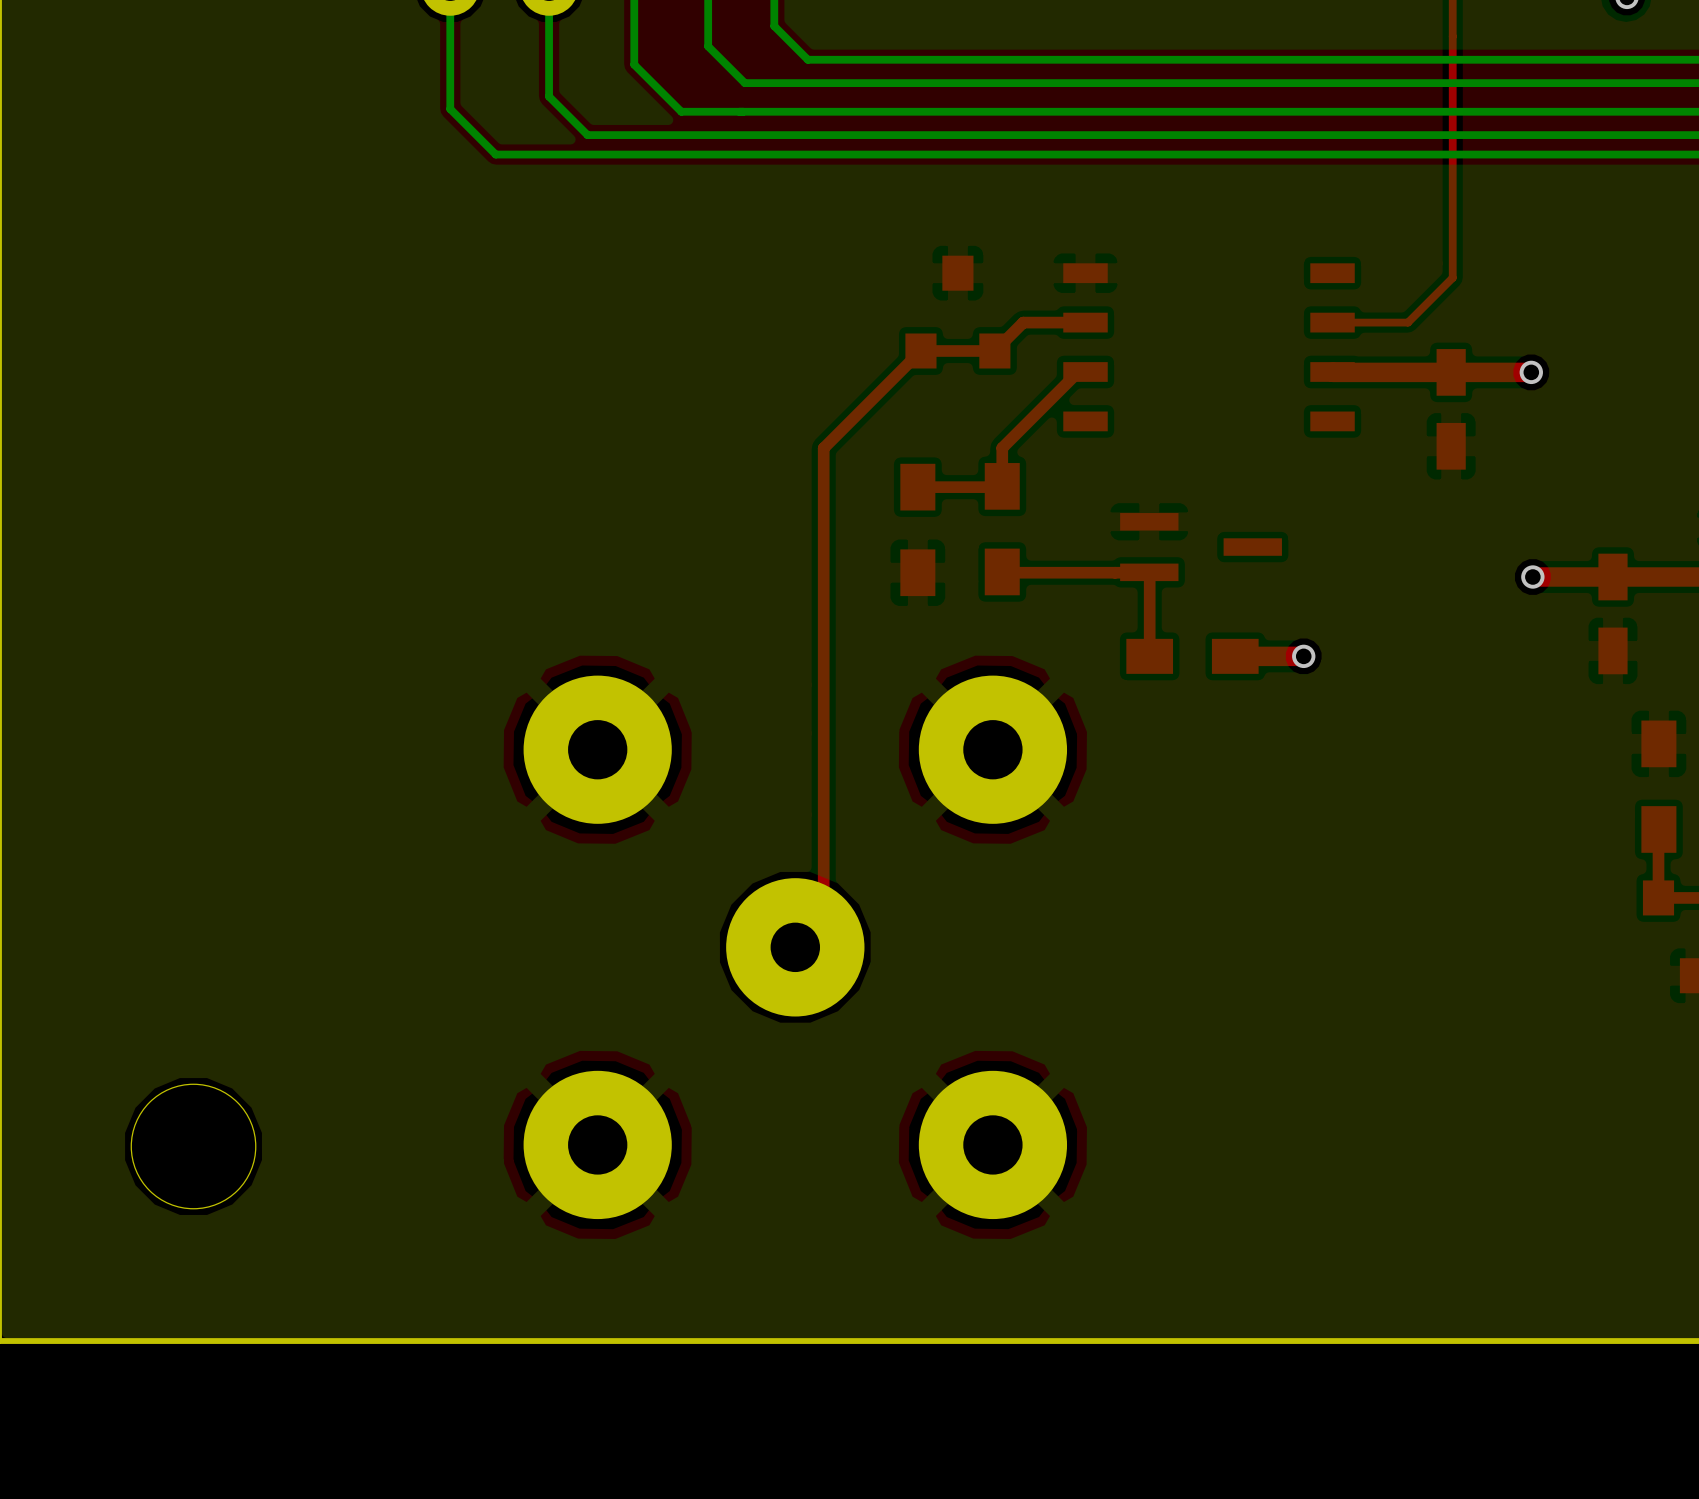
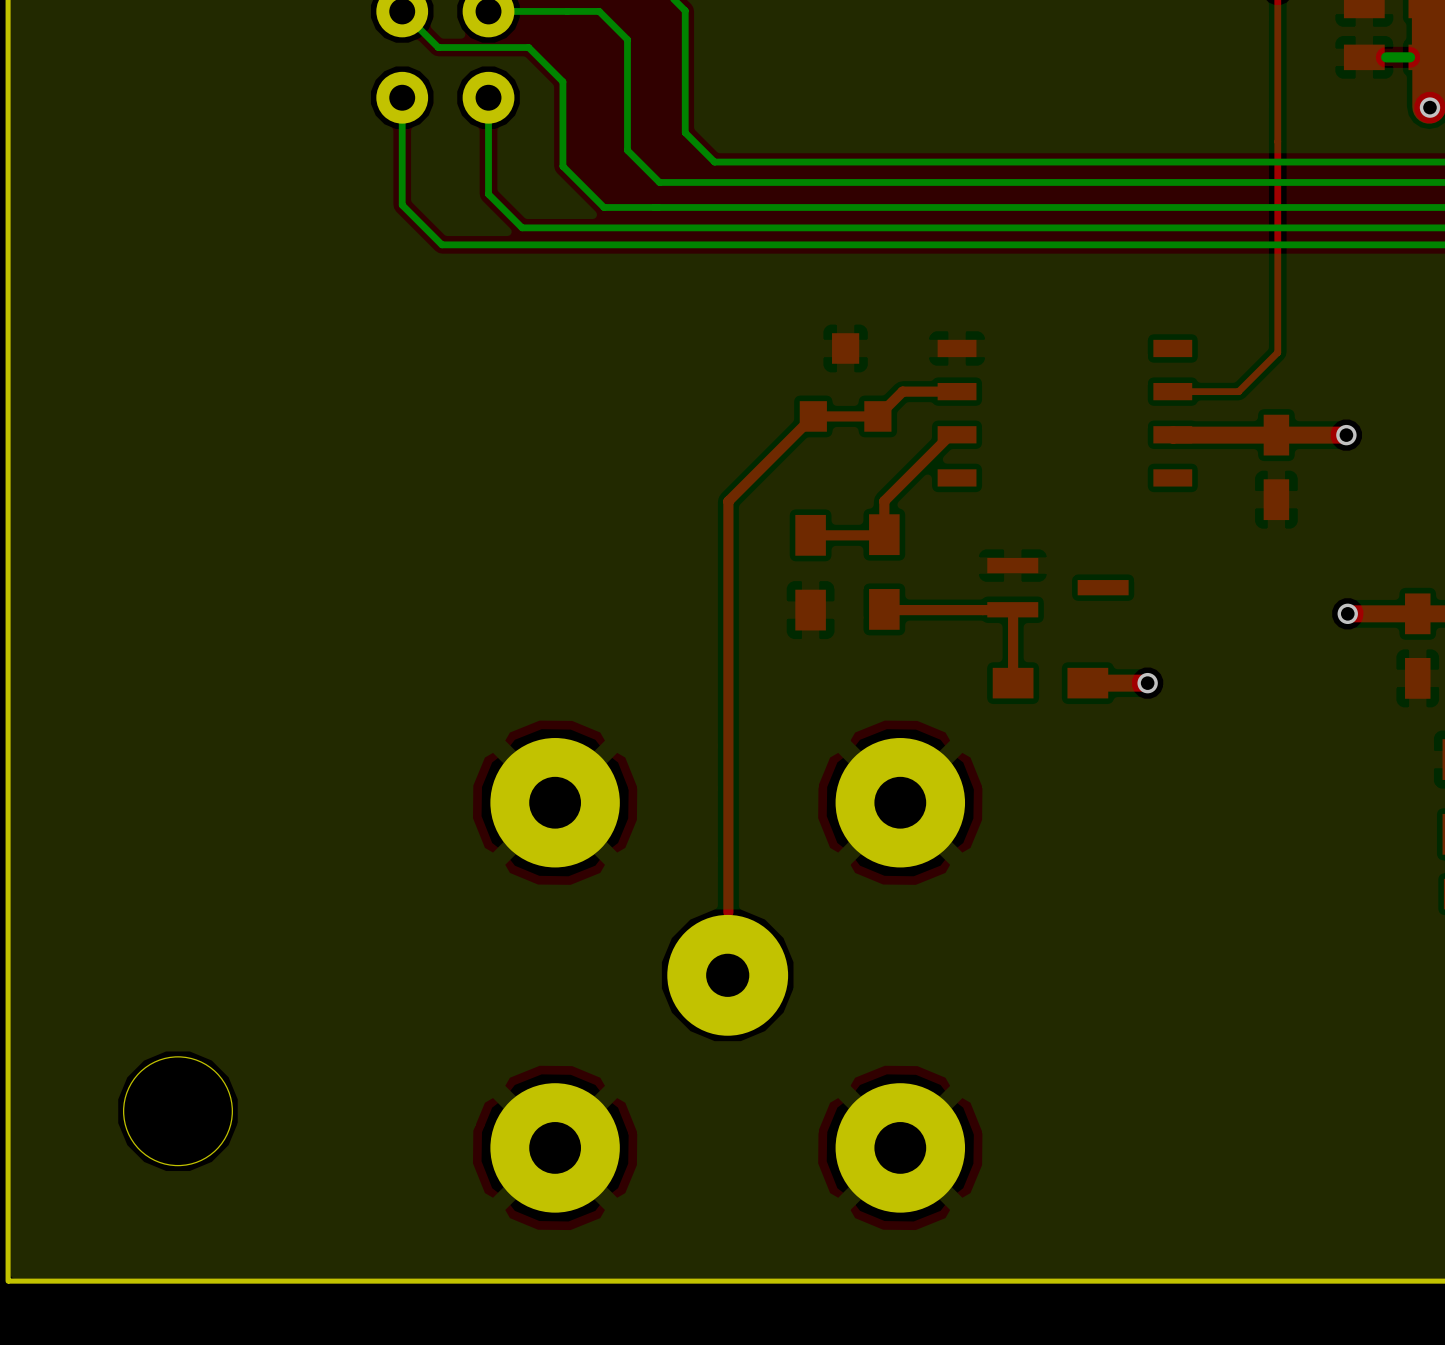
part position: (795, 947) -> (727, 975)

